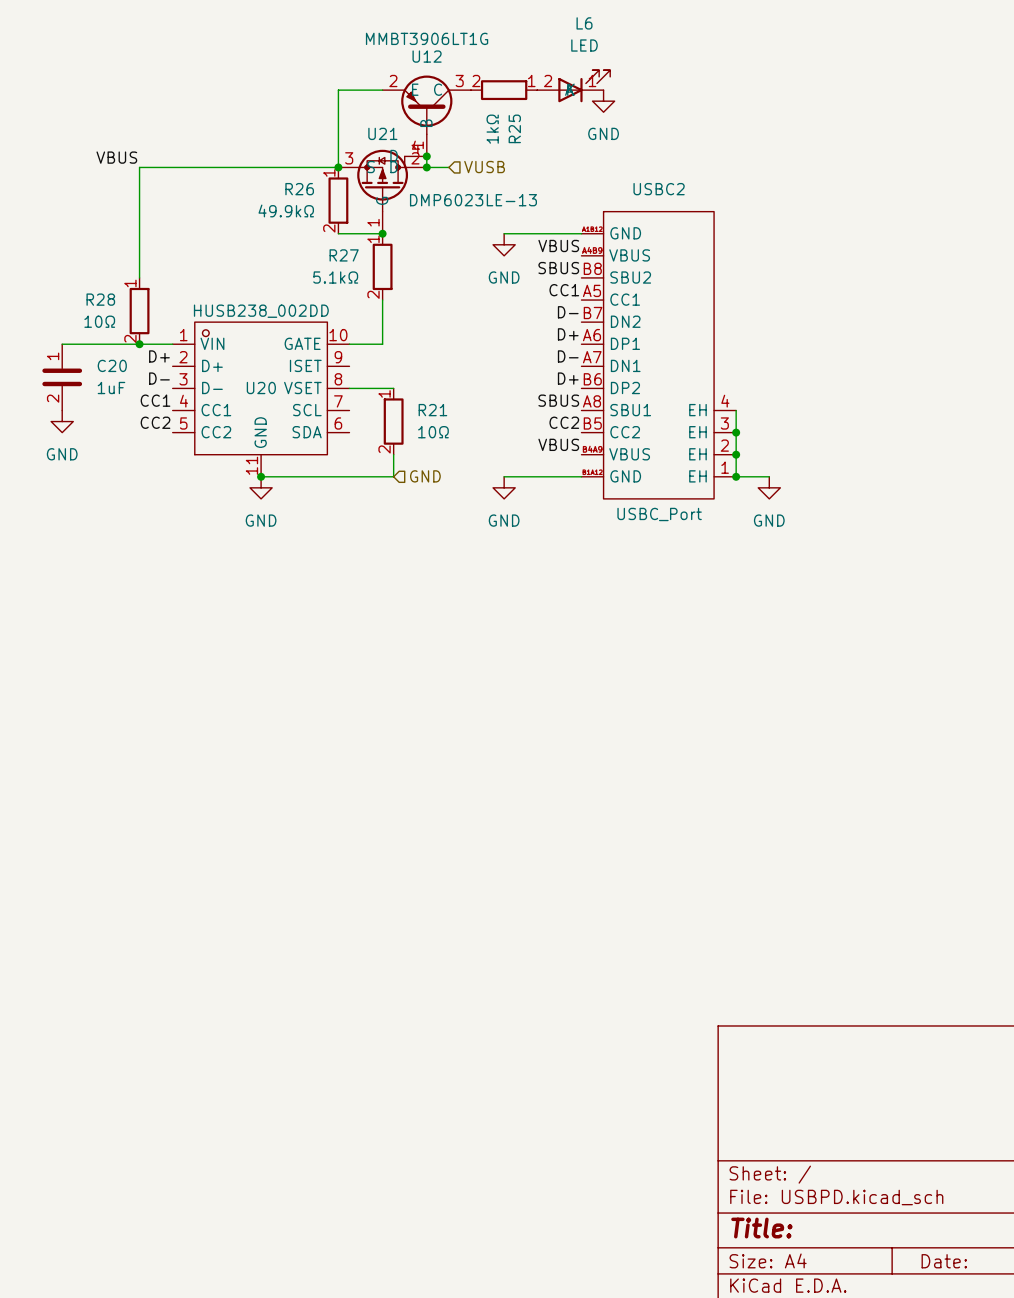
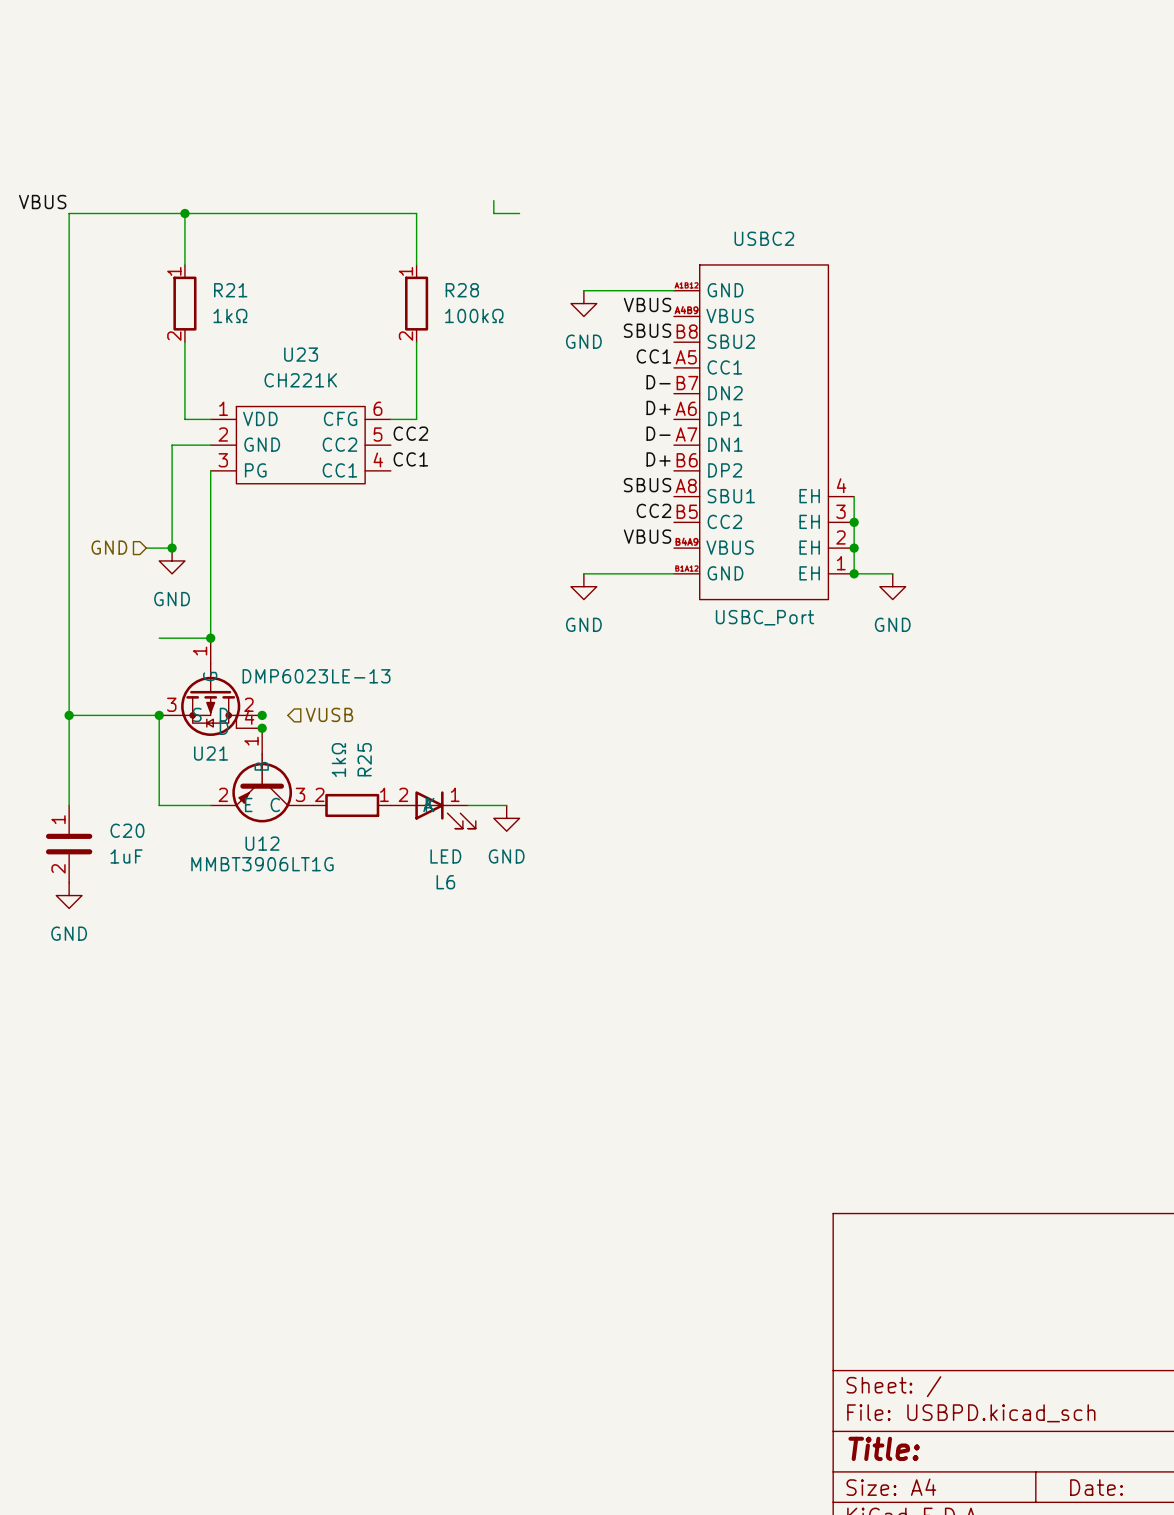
L6 position: (573, 86) -> (433, 809)
L6 flip: as is (584, 86) -> up-down (445, 809)
wire: (382, 90) (338, 90) (338, 167) -> (416, 264) (416, 213) (390, 213)
R25 position: (504, 90) -> (352, 805)
power symbol: GND (603, 101) -> none
U12 flip: as is (426, 105) -> up-down (262, 787)
U12 position: (426, 115) -> (262, 775)
R25 name position: R25 (514, 128) -> R25 (364, 759)
R25 value position: 1kΩ (492, 129) -> 1kΩ (338, 760)
junction: (426, 156) -> none
label position: VBUS (116, 157) -> VBUS (42, 202)
wire: (139, 167) (139, 277) -> (159, 213) (69, 213) (69, 805)
wire: none -> (184, 213) (184, 264)
junction: none -> (184, 213)
junction: (338, 167) -> none
junction: (426, 167) -> none
hierarchical label: VUSB (484, 167) -> none
U21 flip: as is (382, 180) -> up-down (210, 699)
U21 position: (382, 191) -> (210, 687)
R26: 49.9kΩ (338, 200) -> none
wire: (338, 233) (382, 233) -> none
junction: (382, 233) -> none
R27: 5.1kΩ (382, 266) -> none
R28 name position: R28 (100, 299) -> R28 (462, 290)
wire: (382, 300) (382, 344) (360, 344) -> (416, 342) (416, 419)
R28 position: (139, 311) -> (416, 303)
R28 value: 10Ω (99, 321) -> 100kΩ (474, 315)
wire: (62, 344) (161, 344) -> (184, 342) (184, 419)
junction: (139, 344) -> none
label: D+ (159, 356) -> none
wire: none -> (210, 445) (172, 445) (172, 548) (146, 548)
U23: none -> CH221K (300, 445)
C20 position: (62, 377) -> (69, 844)
label: D- (159, 378) -> none
wire: none -> (210, 470) (210, 638) (159, 638)
wire: (349, 388) (393, 388) -> none
U20: HUSB238_002DD (261, 399) -> none
label position: CC1 (155, 400) -> CC1 (410, 459)
power symbol: GND (62, 421) -> none
R21 position: (393, 421) -> (184, 303)
label position: CC2 (155, 422) -> CC2 (410, 433)
R21 value: 10Ω (433, 432) -> 1kΩ (230, 315)
hierarchical label: none -> GND (109, 547)
junction: none -> (172, 548)
wire: (393, 454) (393, 476) (261, 476) -> none
power symbol: none -> GND (172, 560)
junction: (261, 476) -> none
hierarchical label: GND (425, 476) -> none
power symbol: GND (261, 487) -> none
junction: none -> (210, 638)
hierarchical label: none -> VUSB (329, 714)
wire: none -> (69, 715) (159, 715) (159, 805) (210, 805)
junction: none -> (69, 715)
junction: none -> (159, 715)
junction: none -> (262, 715)
junction: none -> (262, 728)
wire: none -> (468, 805) (506, 805)
power symbol: none -> GND (506, 818)
power symbol: none -> GND (69, 895)

